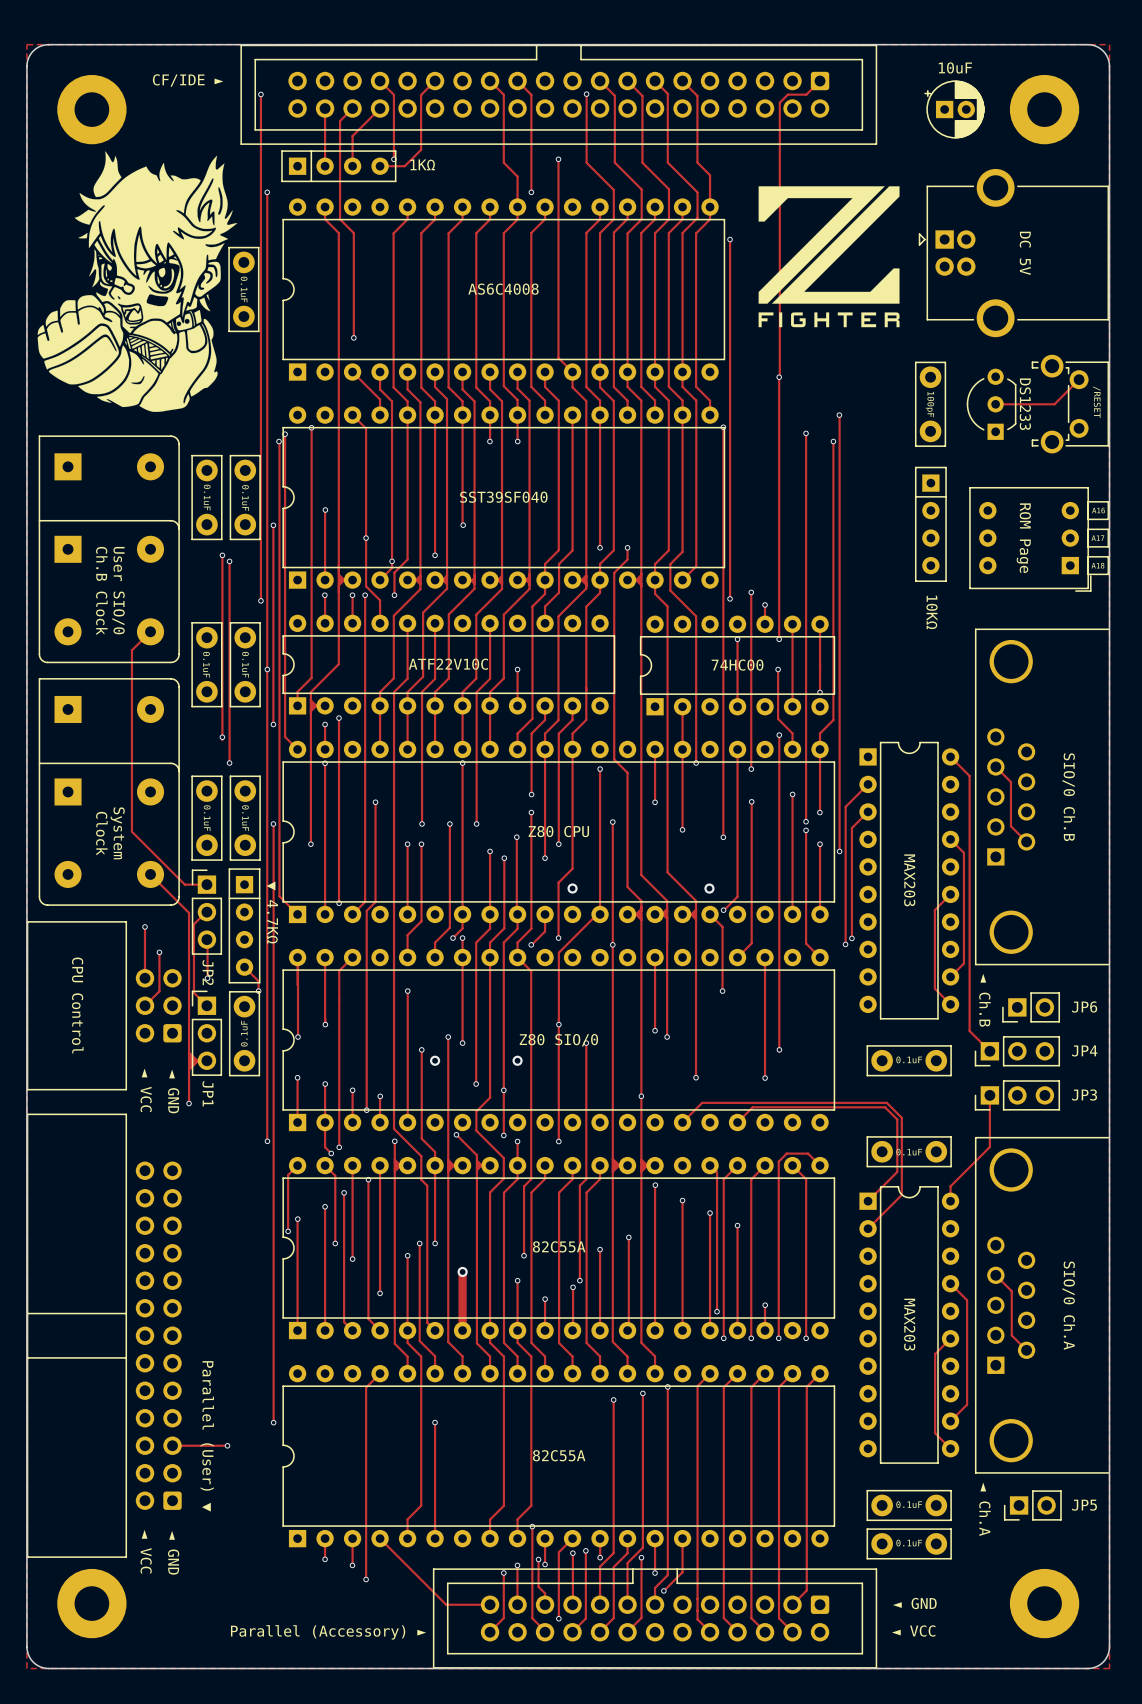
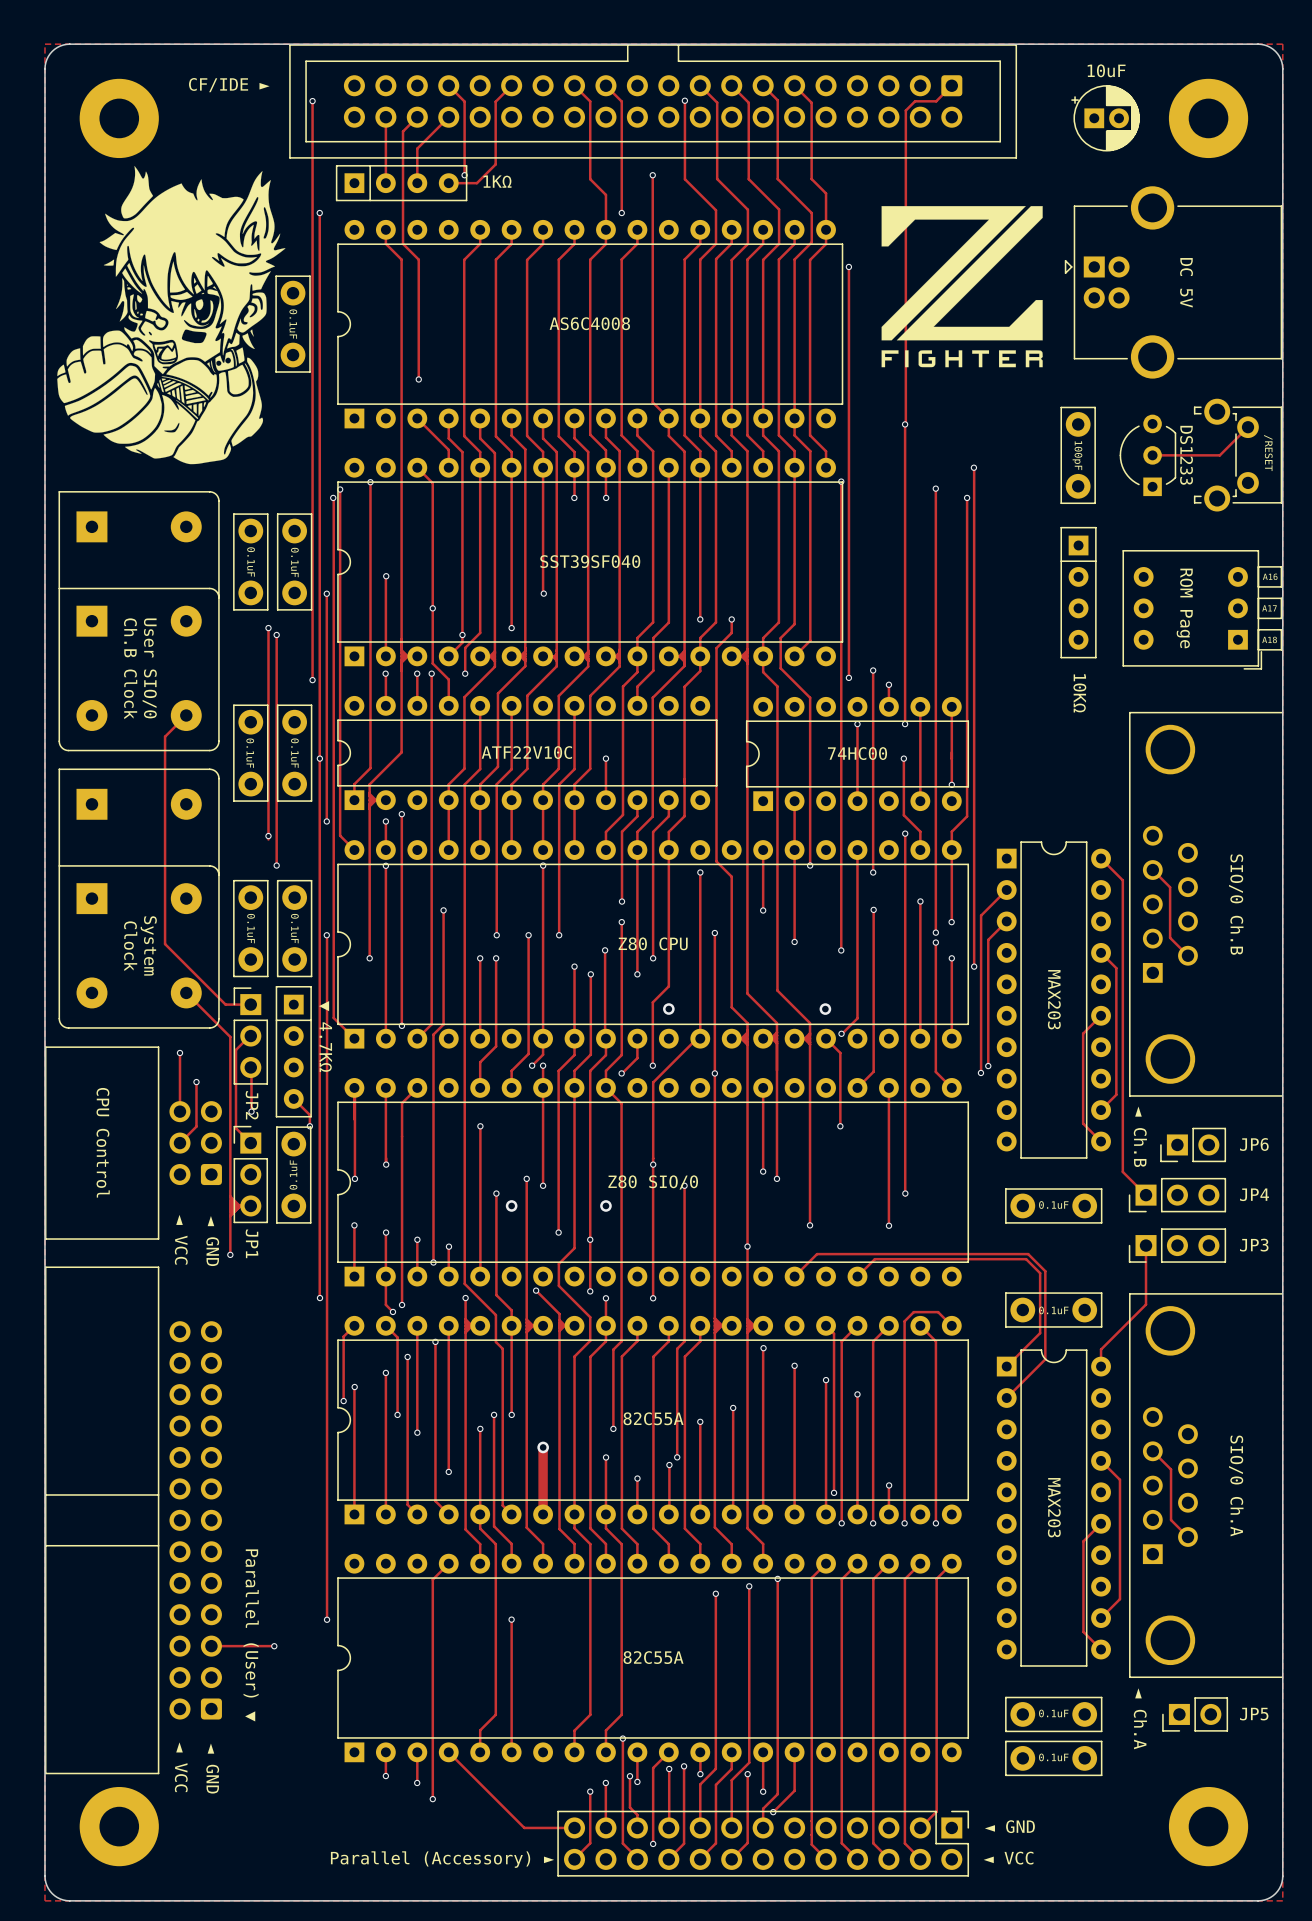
part footprint: [433, 1568, 878, 1669] -> [557, 1810, 970, 1877]
text position: ◄ GND (914, 1603) -> ◄ GND (1009, 1826)
text position: ◄ VCC (913, 1631) -> ◄ VCC (1008, 1858)
text position: Parallel (Accessory) ► (328, 1632) -> Parallel (Accessory) ► (442, 1859)

